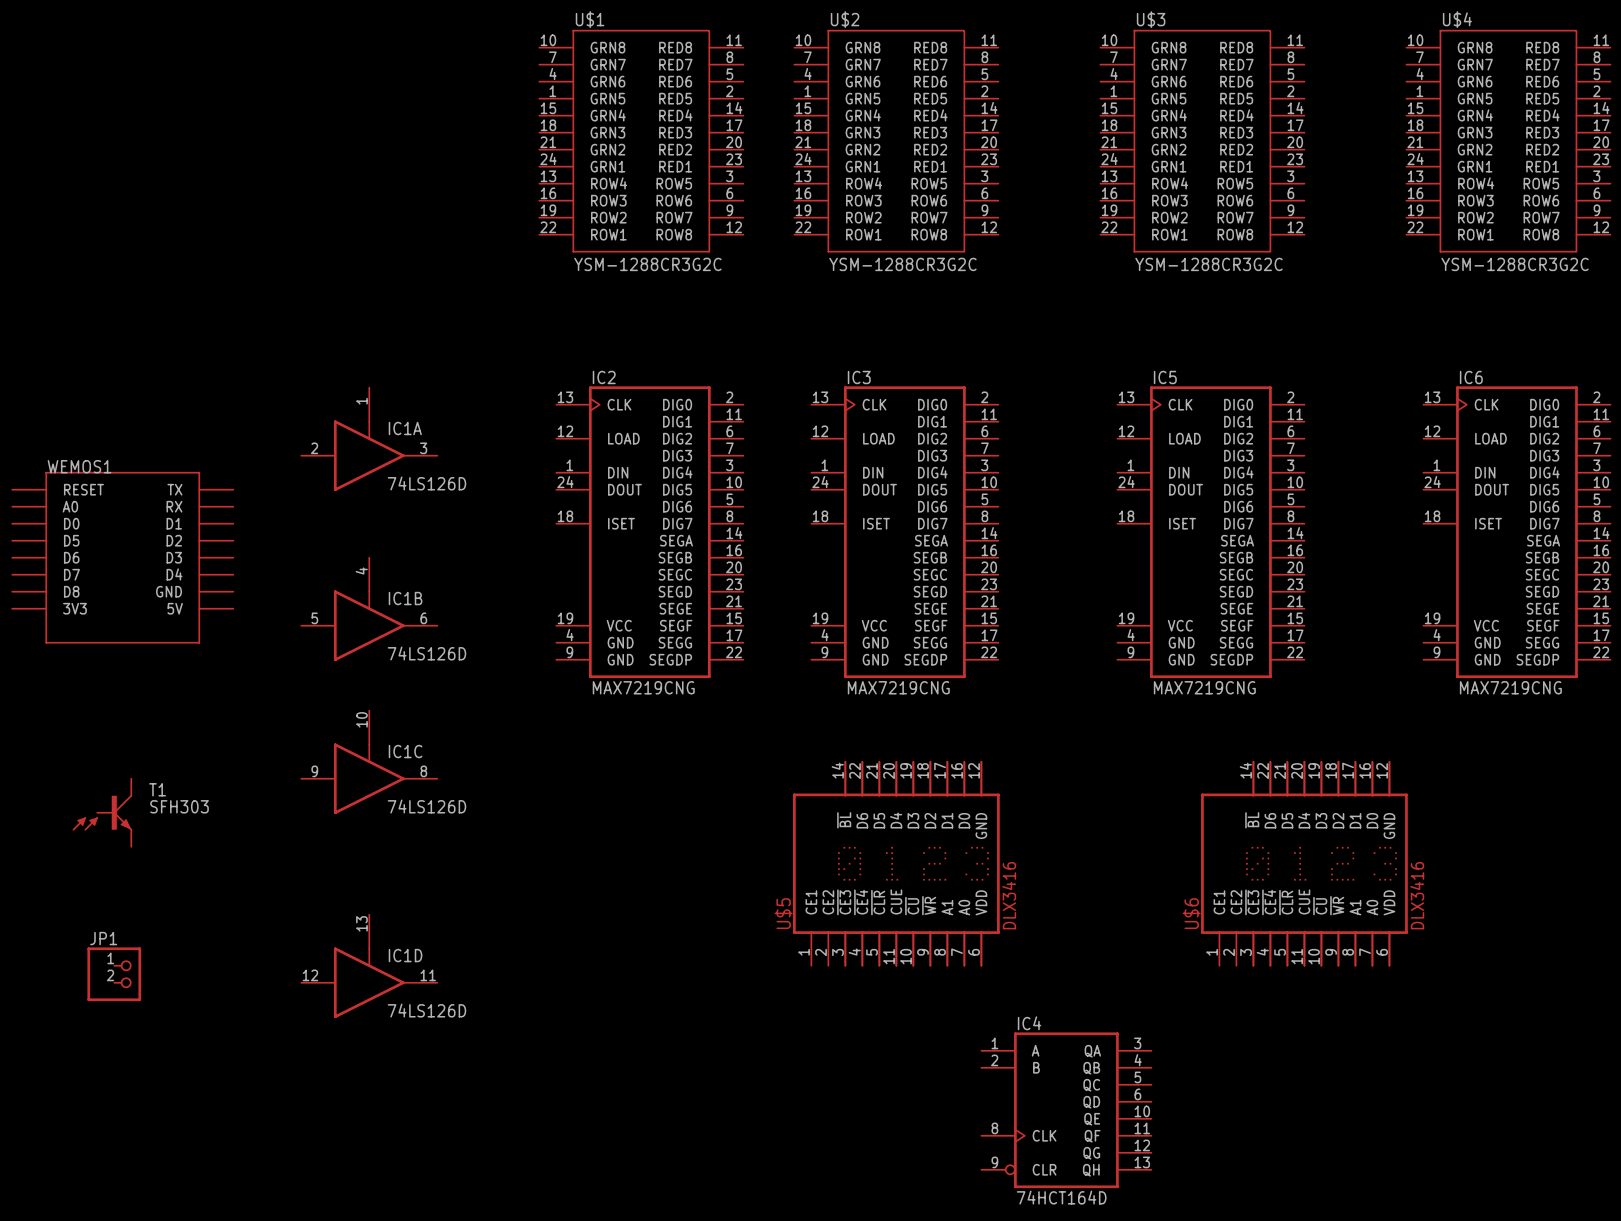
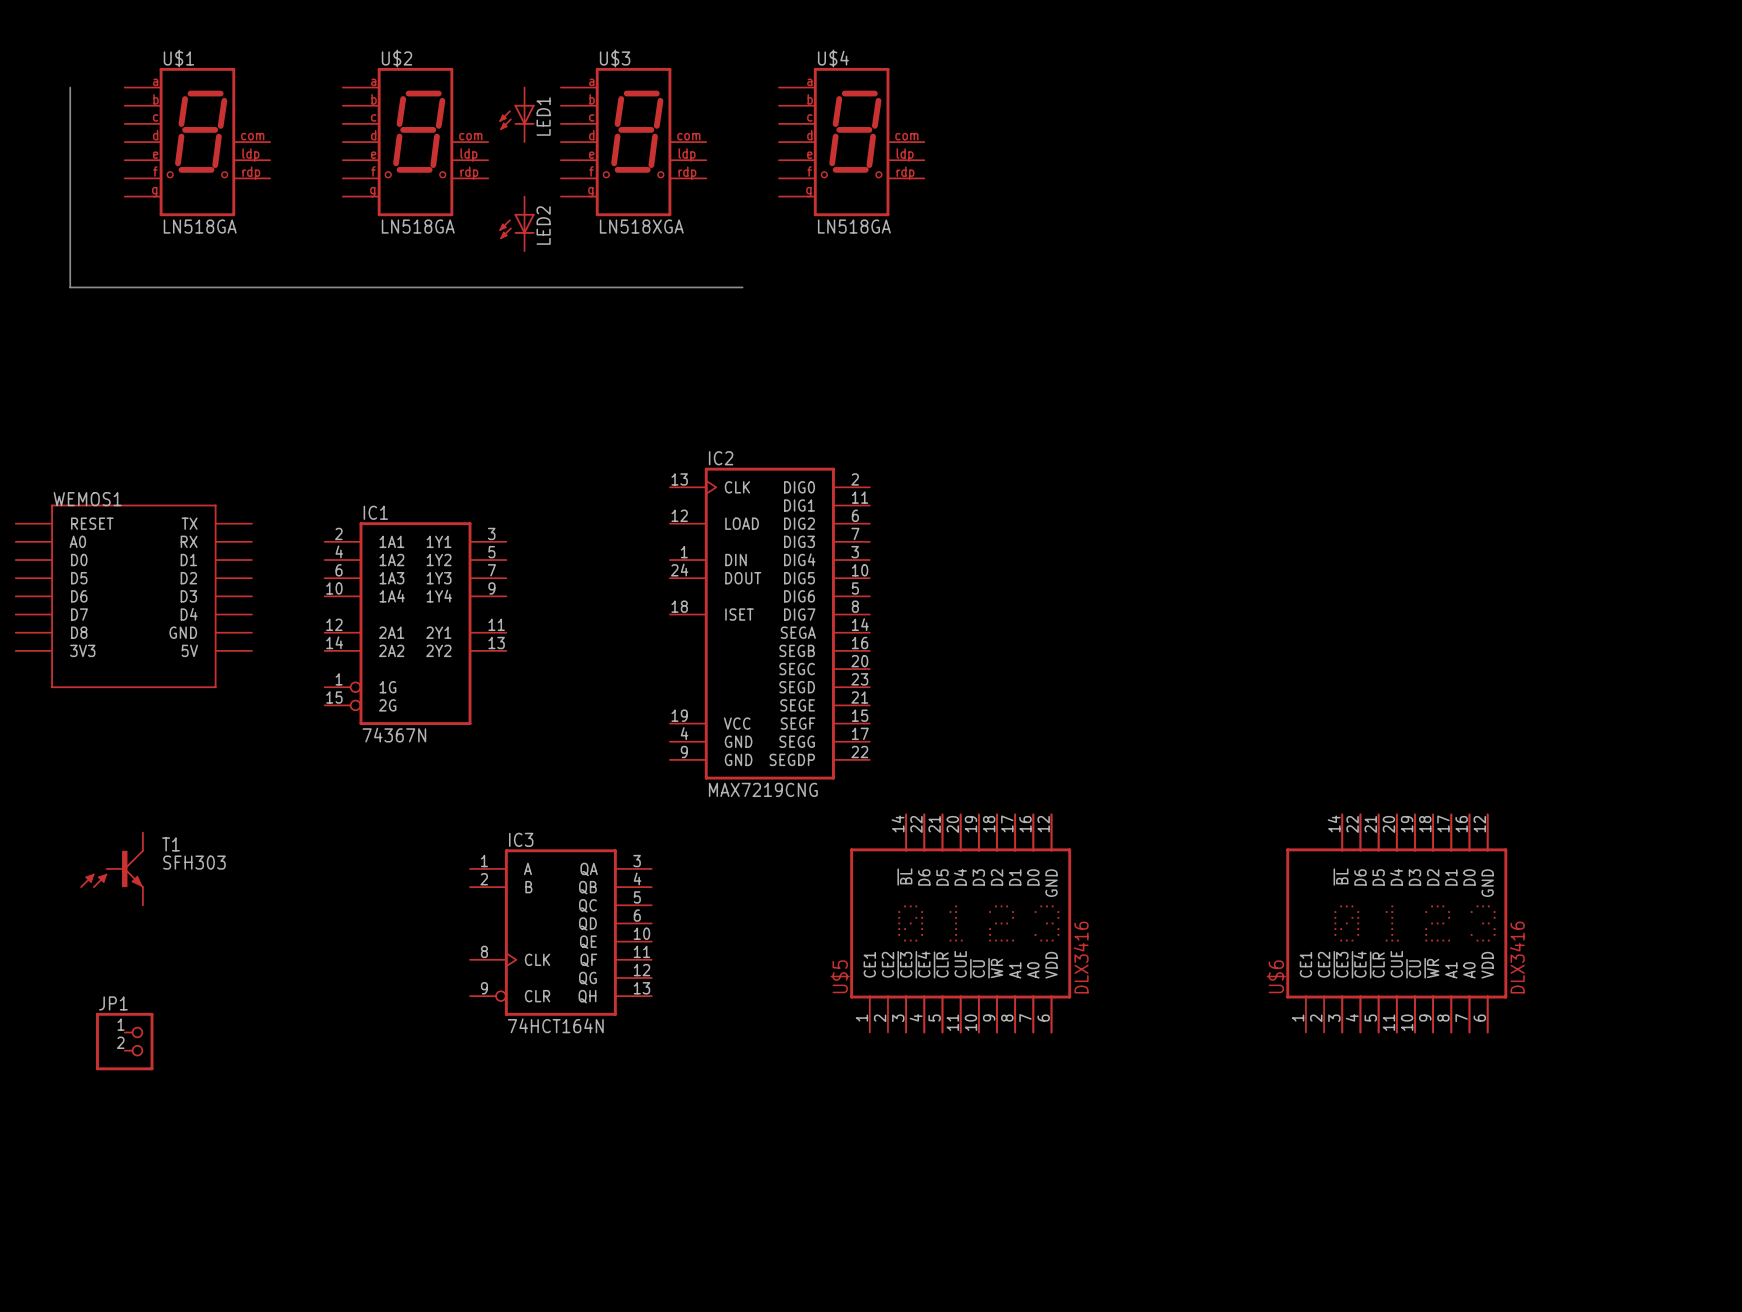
U$1 name position: U$1 (590, 19) -> U$1 (178, 58)
U$2 name position: U$2 (845, 19) -> U$2 (397, 58)
U$3 name position: U$3 (1151, 19) -> U$3 (615, 58)
U$4 name position: U$4 (1457, 19) -> U$4 (833, 58)
U$1 symbol: [539, 29, 744, 253] -> [124, 67, 271, 217]
U$2 symbol: [794, 29, 999, 253] -> [342, 67, 489, 217]
U$3 symbol: [1100, 29, 1305, 253] -> [560, 67, 707, 217]
U$4 symbol: [1406, 29, 1611, 253] -> [778, 67, 925, 217]
bus: none -> (70, 87) (70, 287) (742, 287)
LED1: none -> (516, 114)
LED2: none -> (516, 223)
U$1 value: YSM-1288CR3G2C (647, 264) -> LN518GA (200, 226)
U$2 value: YSM-1288CR3G2C (902, 264) -> LN518GA (418, 226)
U$3 value: YSM-1288CR3G2C (1208, 264) -> LN518XGA (641, 226)
U$4 value: YSM-1288CR3G2C (1515, 264) -> LN518GA (854, 226)
IC3 name position: IC3 (859, 377) -> IC3 (521, 839)
IC3 symbol: [811, 386, 999, 679] -> [470, 849, 652, 1016]
IC1A: 74LS126D (369, 439) -> none
IC2 position: (649, 532) -> (769, 623)
IC5: MAX7219CNG (1210, 532) -> none
IC6: MAX7219CNG (1516, 532) -> none
IC1: none -> 74367N (415, 623)
IC1B: 74LS126D (369, 609) -> none
IC3 value: MAX7219CNG (898, 687) -> 74HCT164N (555, 1025)
IC1C: 74LS126D (369, 762) -> none
IC1D: 74LS126D (369, 966) -> none
IC4: 74HCT164D (1066, 1110) -> none

